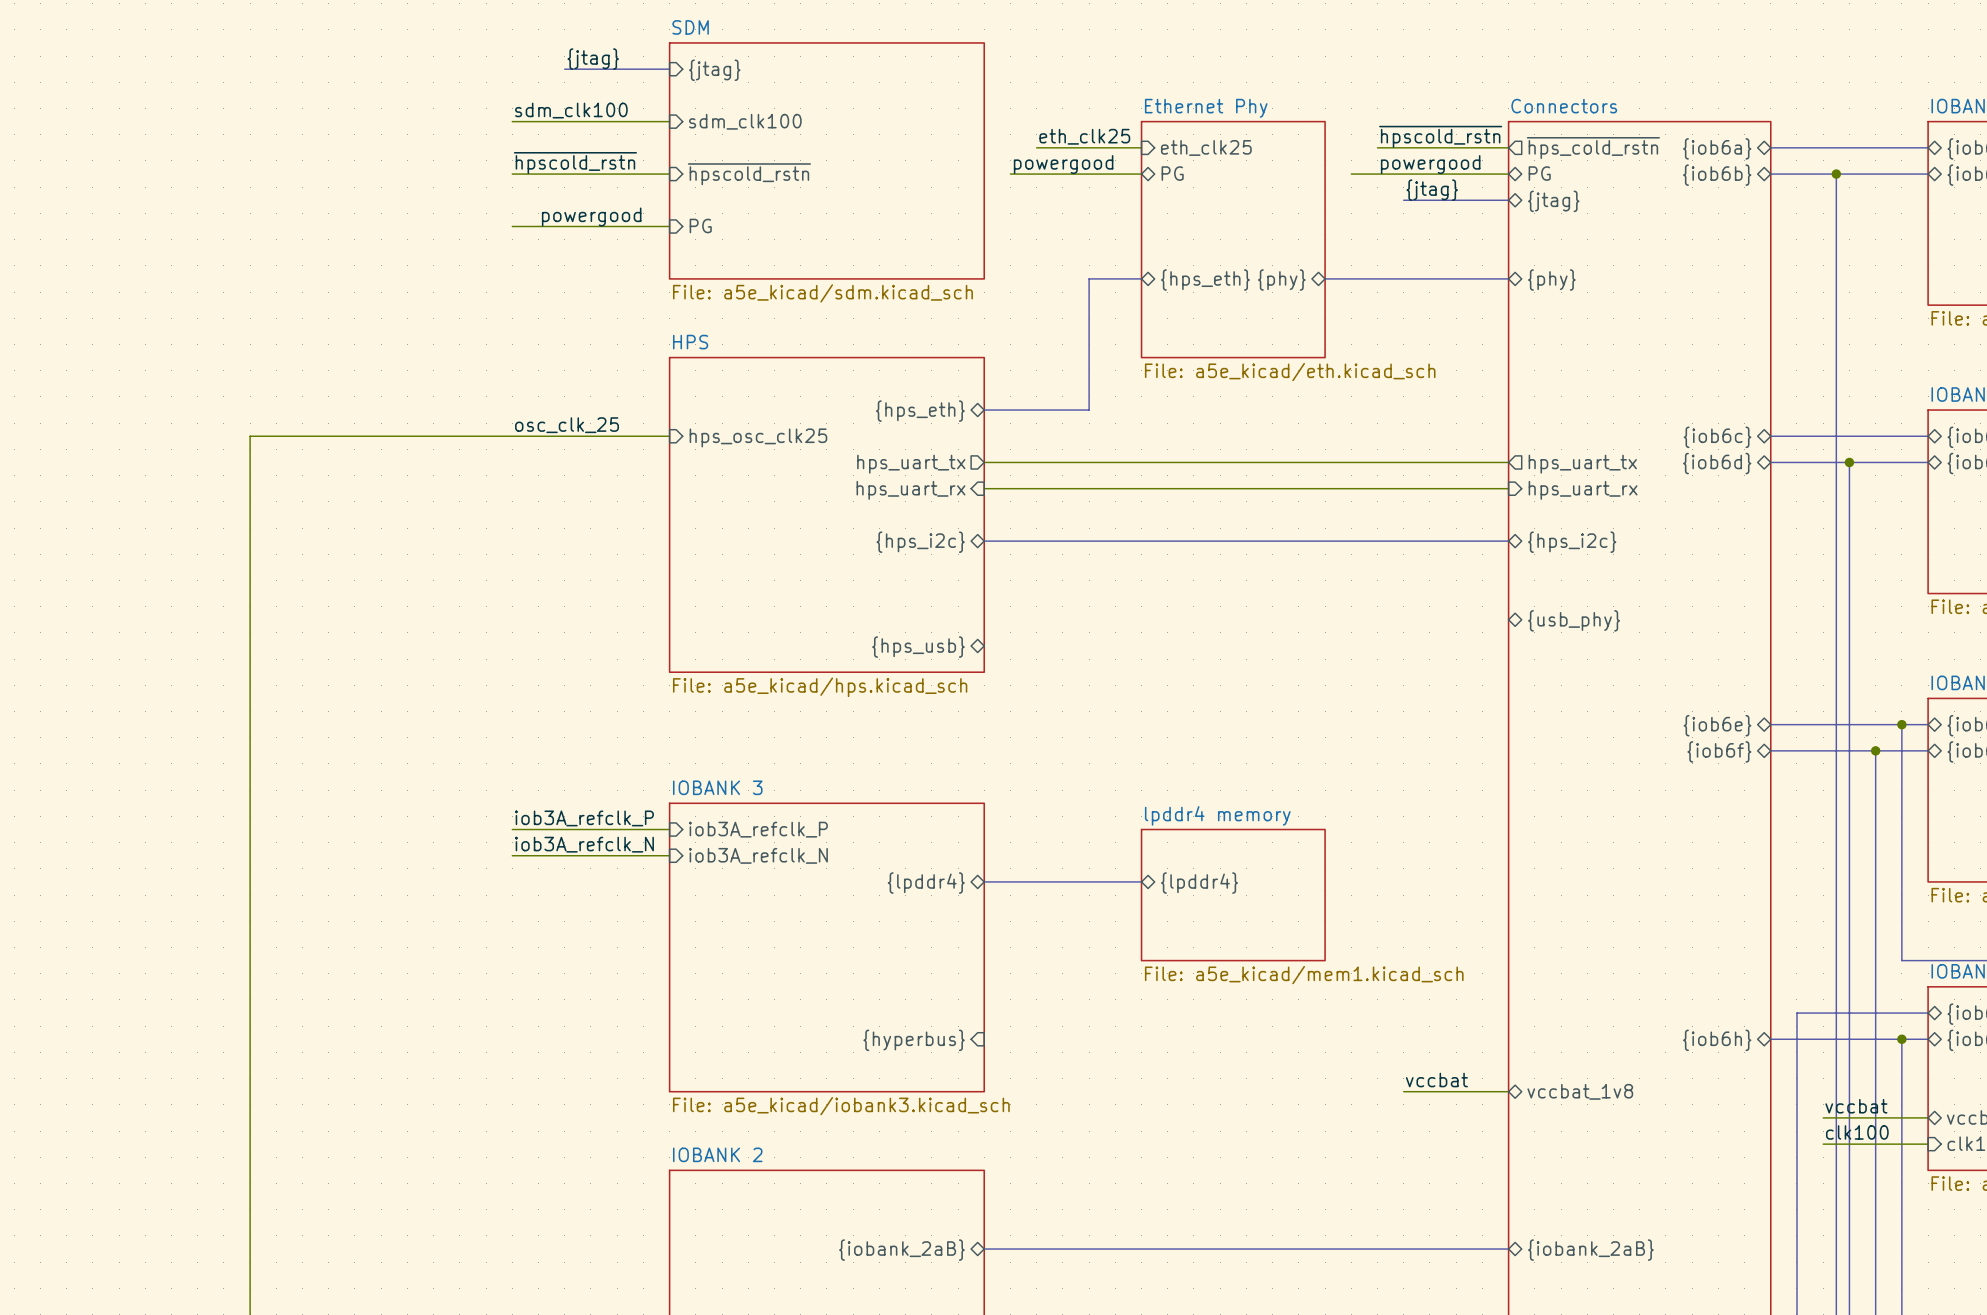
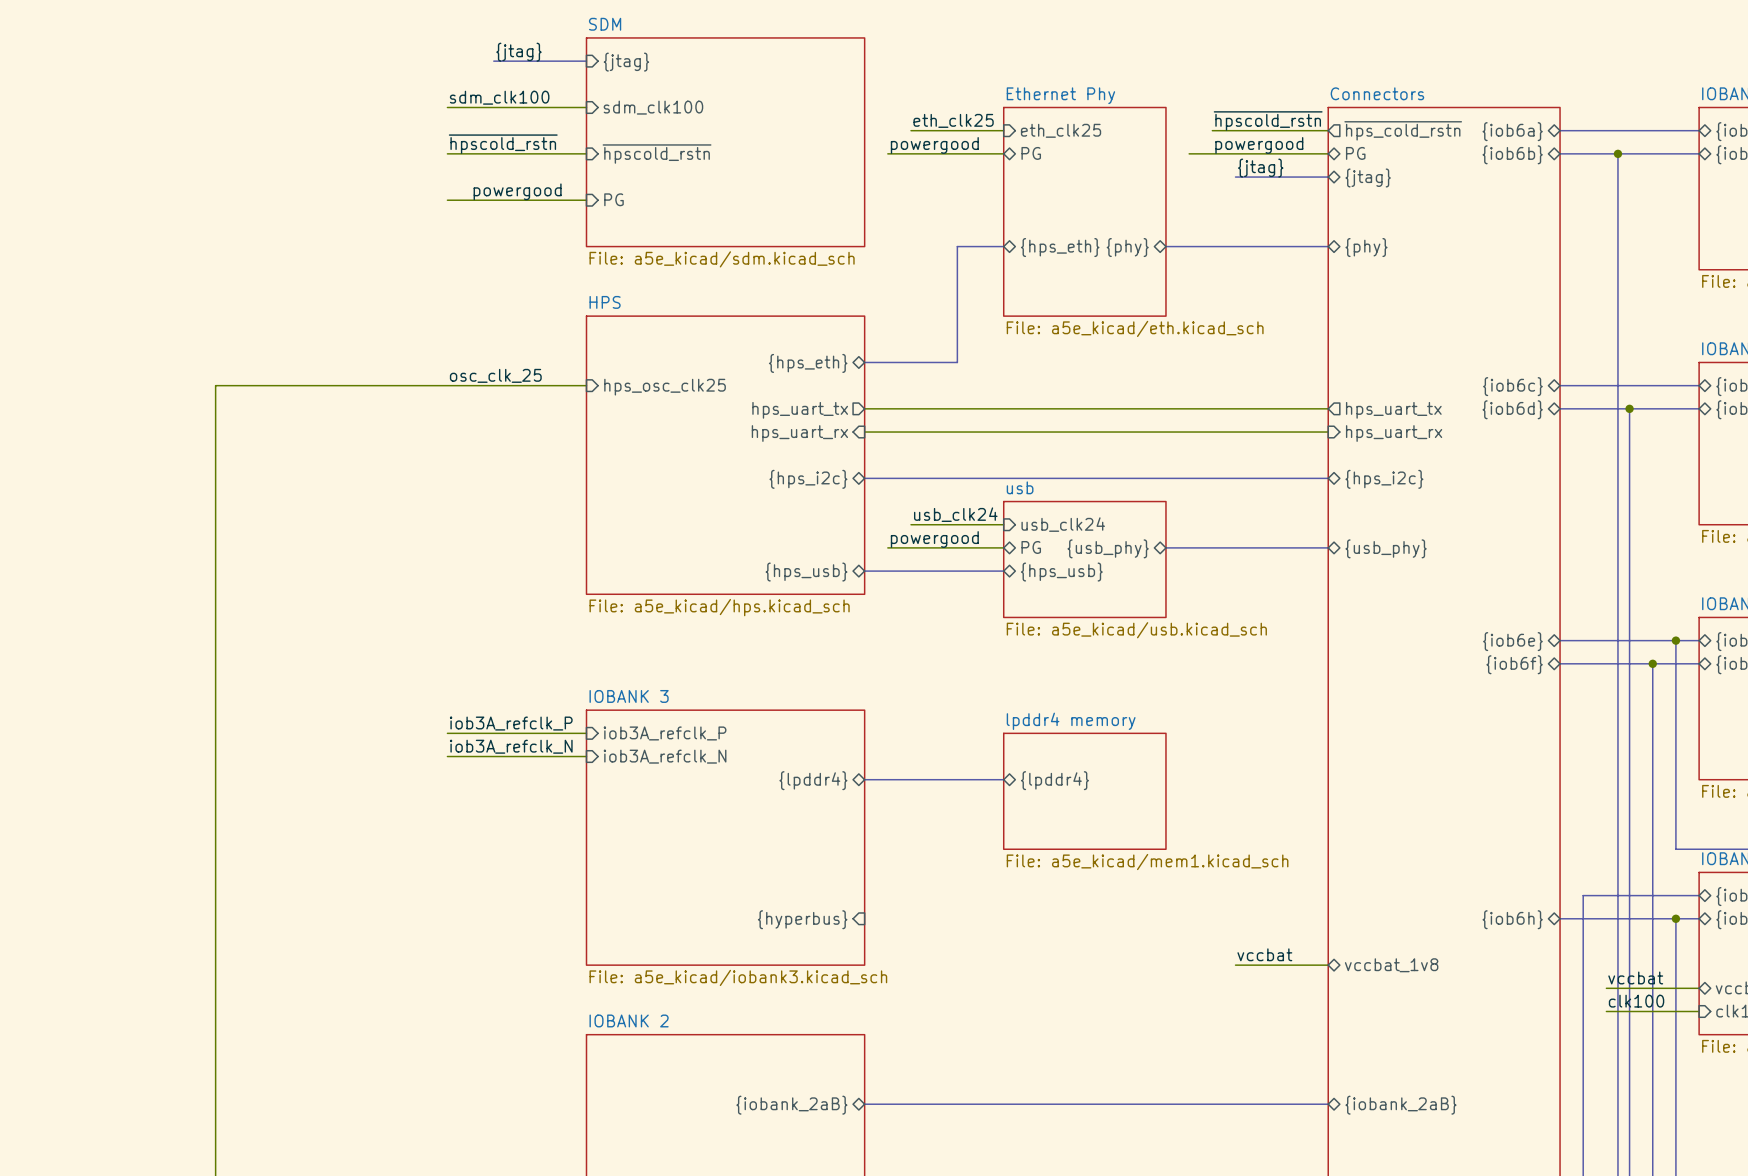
label: none -> usb_clk24 (955, 514)
wire: none -> (911, 524) (1003, 524)
sheet pin: none -> usb_clk24 (1063, 524)
label: none -> powergood (934, 539)
wire: none -> (887, 547) (1003, 547)
sheet pin: none -> PG (1031, 547)
bus: none -> (1165, 547) (1328, 547)
sheet pin: none -> {usb_phy} (1108, 548)
sheet usb: none -> File: a5e_kicad/usb.kicad_sch (1084, 559)
bus: none -> (864, 571) (1003, 571)
sheet pin: none -> {hps_usb} (1061, 572)

